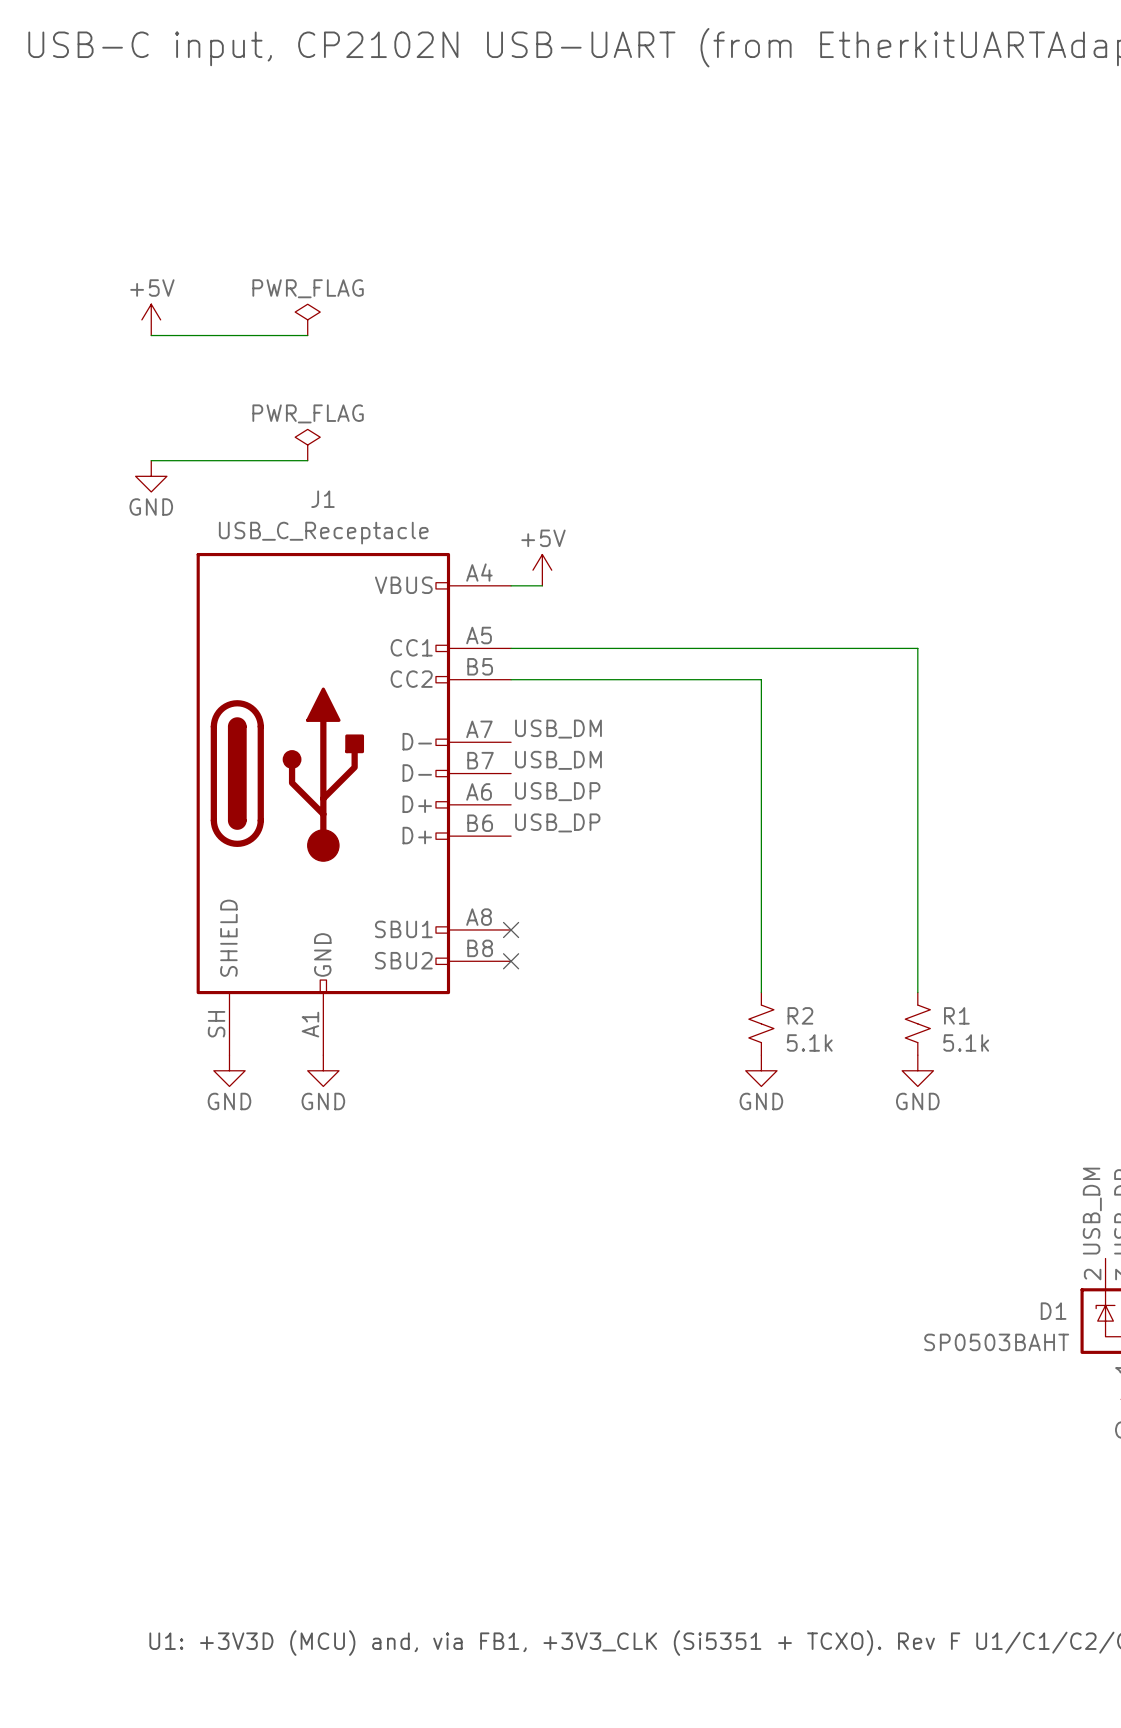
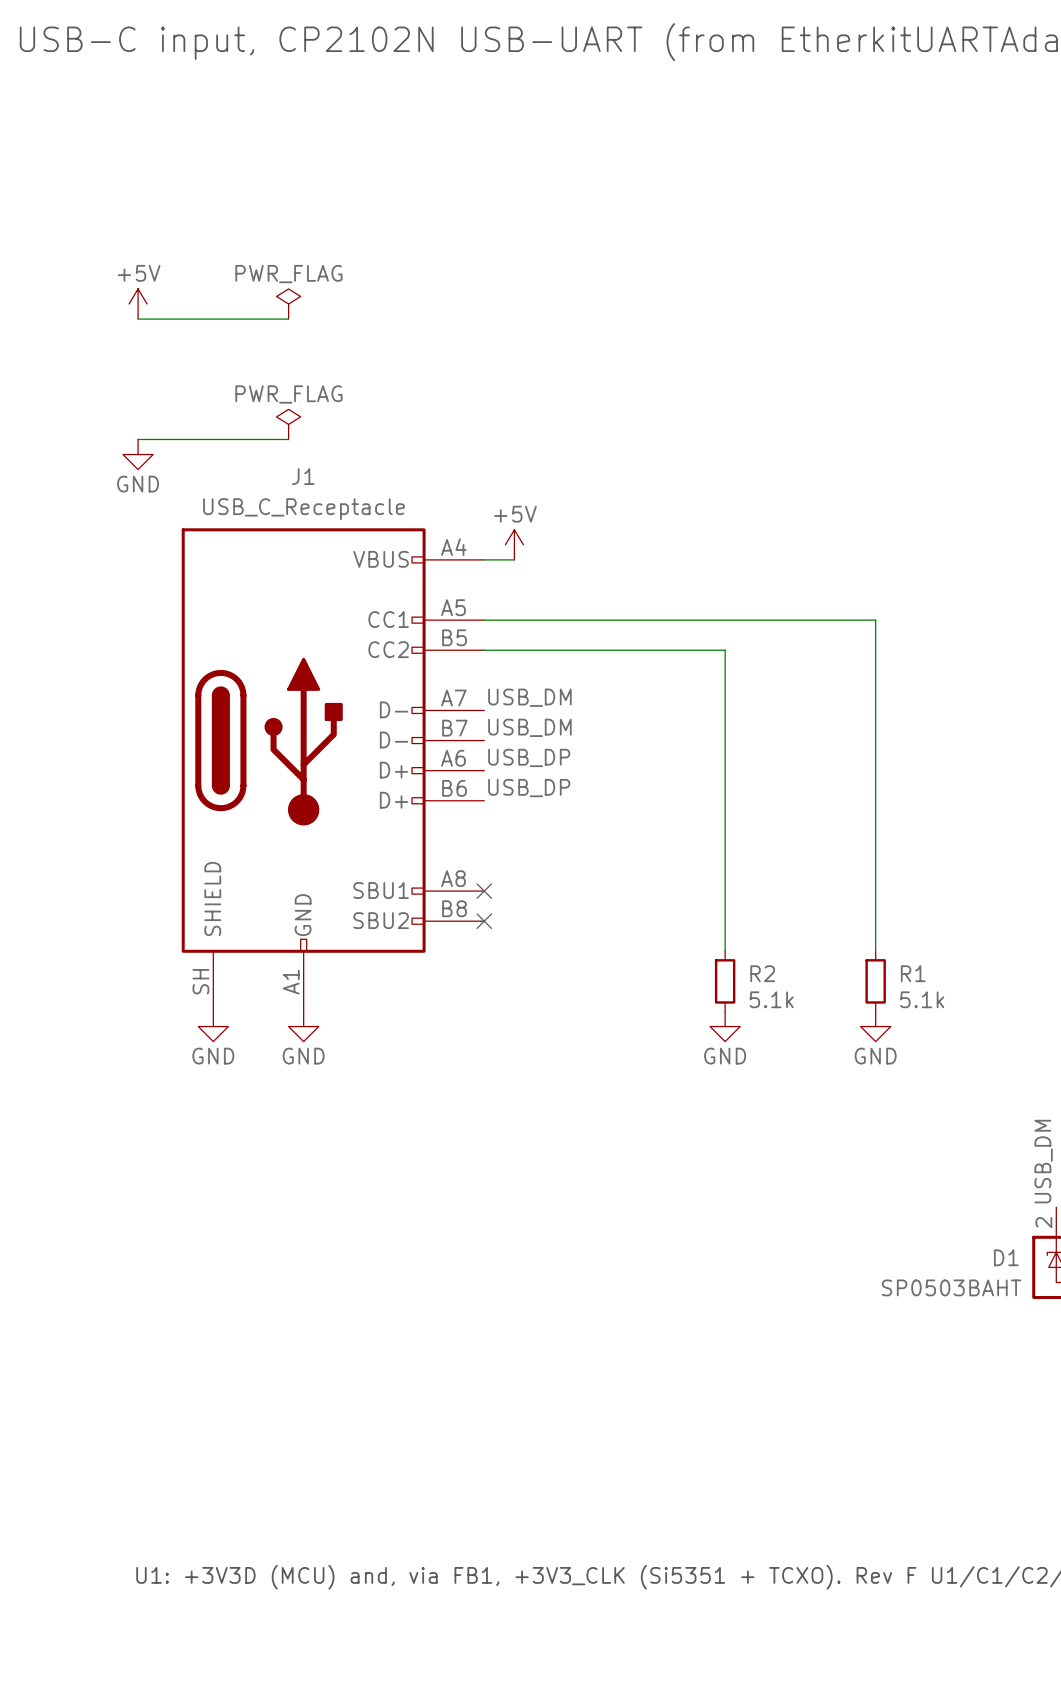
R2 symbol: [748, 992, 774, 1056] -> [714, 951, 736, 1012]
R1 symbol: [905, 992, 931, 1056] -> [865, 951, 886, 1012]

